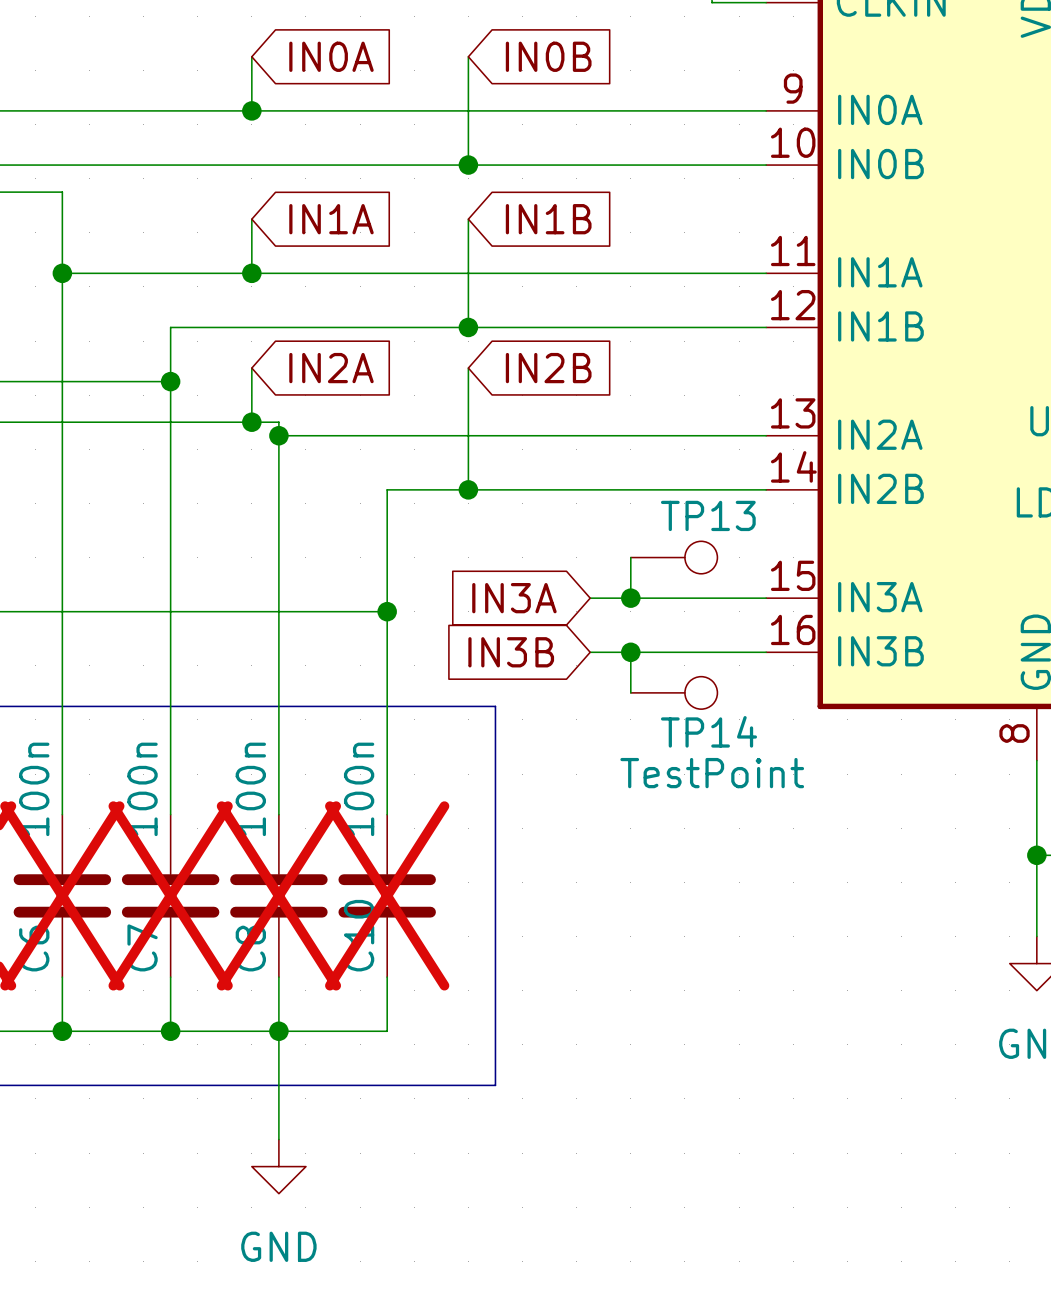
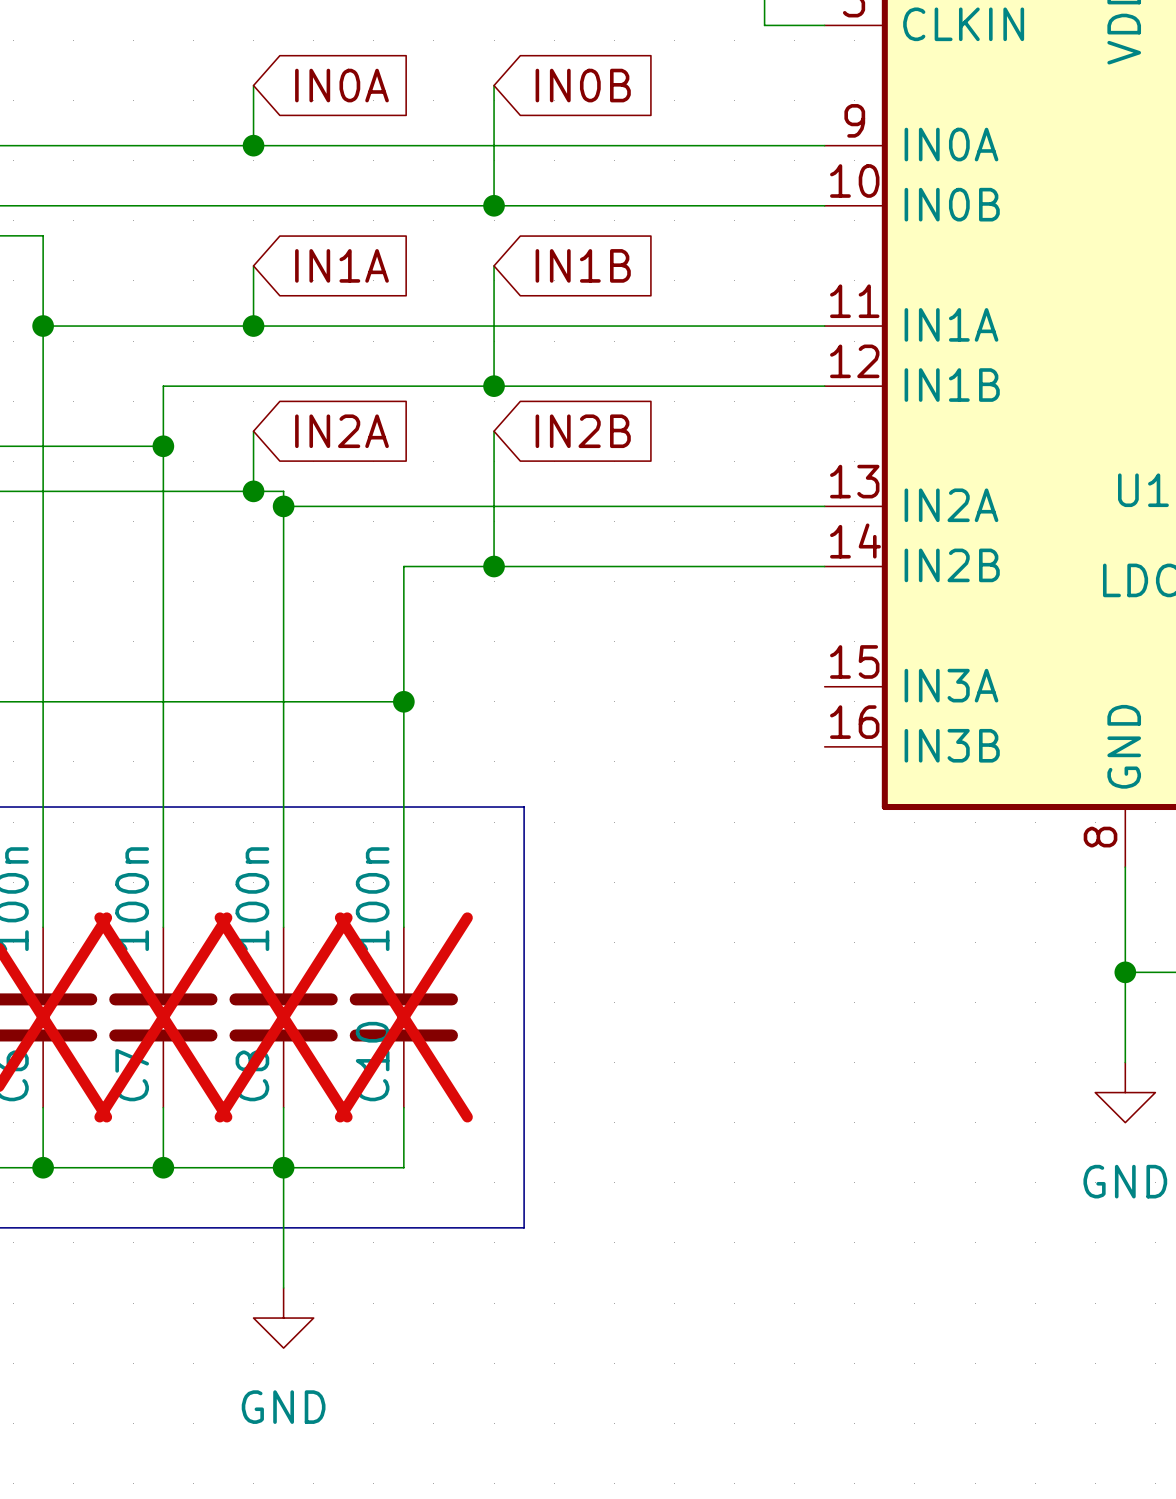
wire: (630, 557) (630, 598) -> none
TP13: (674, 557) -> none
global label: IN3A (514, 598) -> none
wire: (590, 598) (766, 598) -> none
junction: (630, 598) -> none
global label: IN3B (511, 652) -> none
wire: (590, 652) (766, 652) -> none
wire: (630, 652) (630, 692) -> none
junction: (630, 652) -> none
TP14: TestPoint (674, 692) -> none

